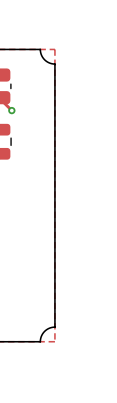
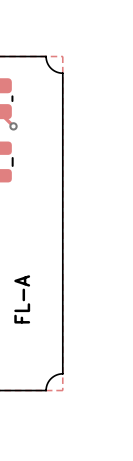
text: none -> FL-A (22, 299)

